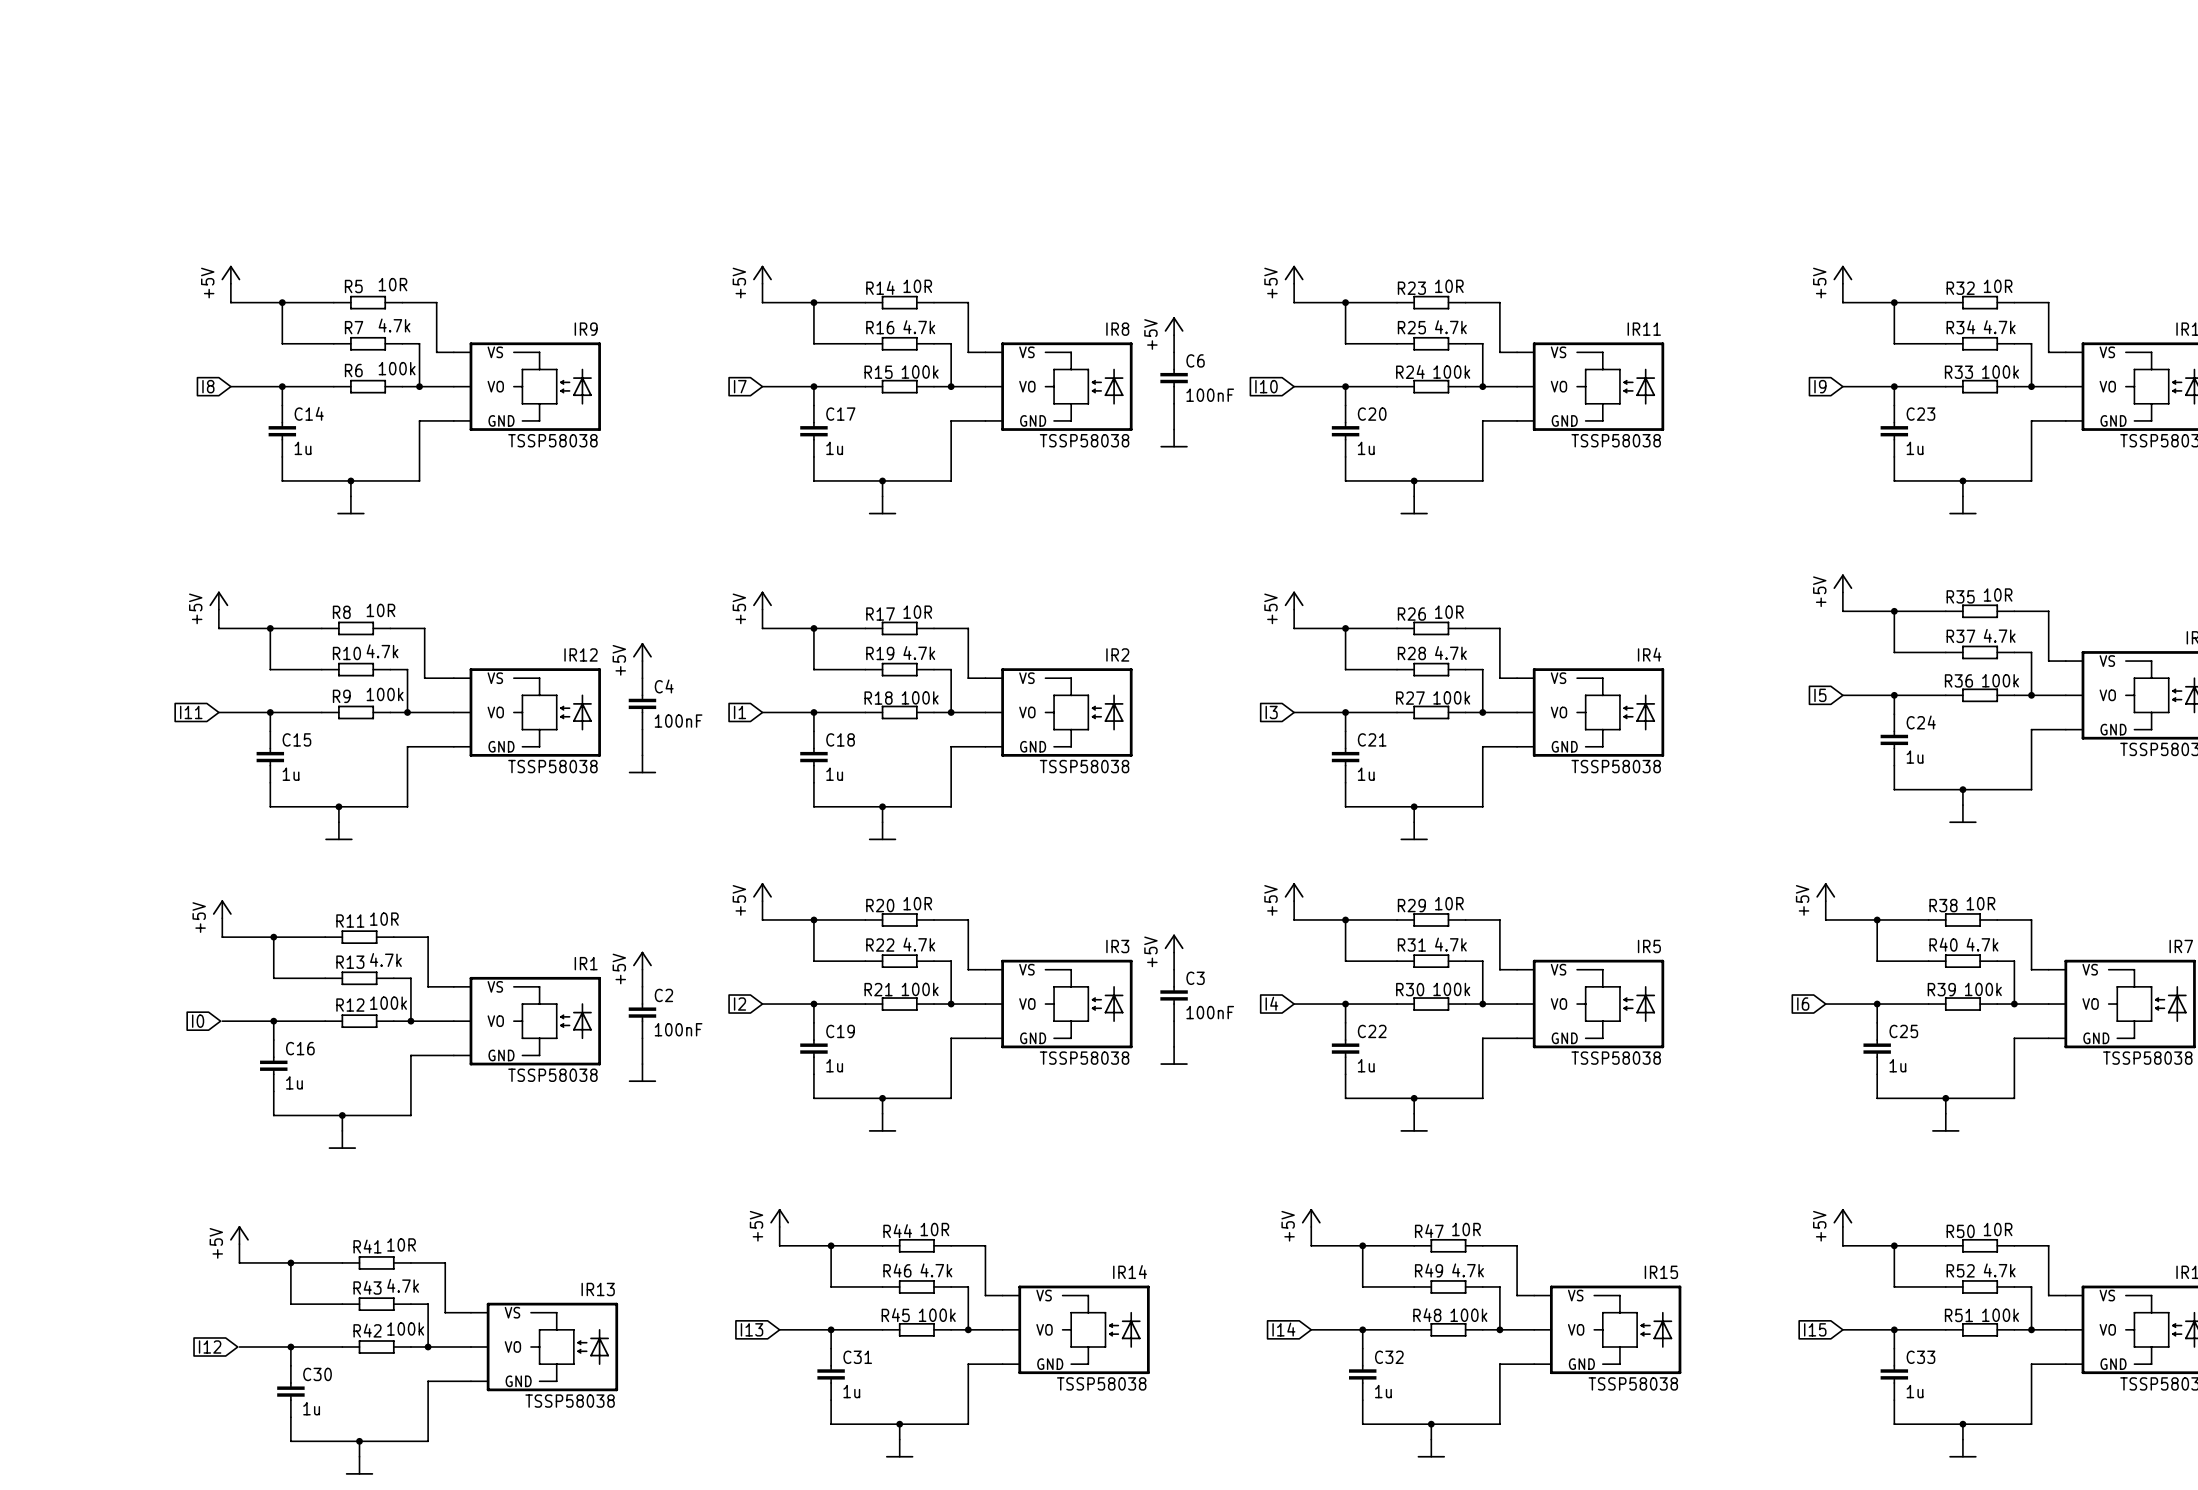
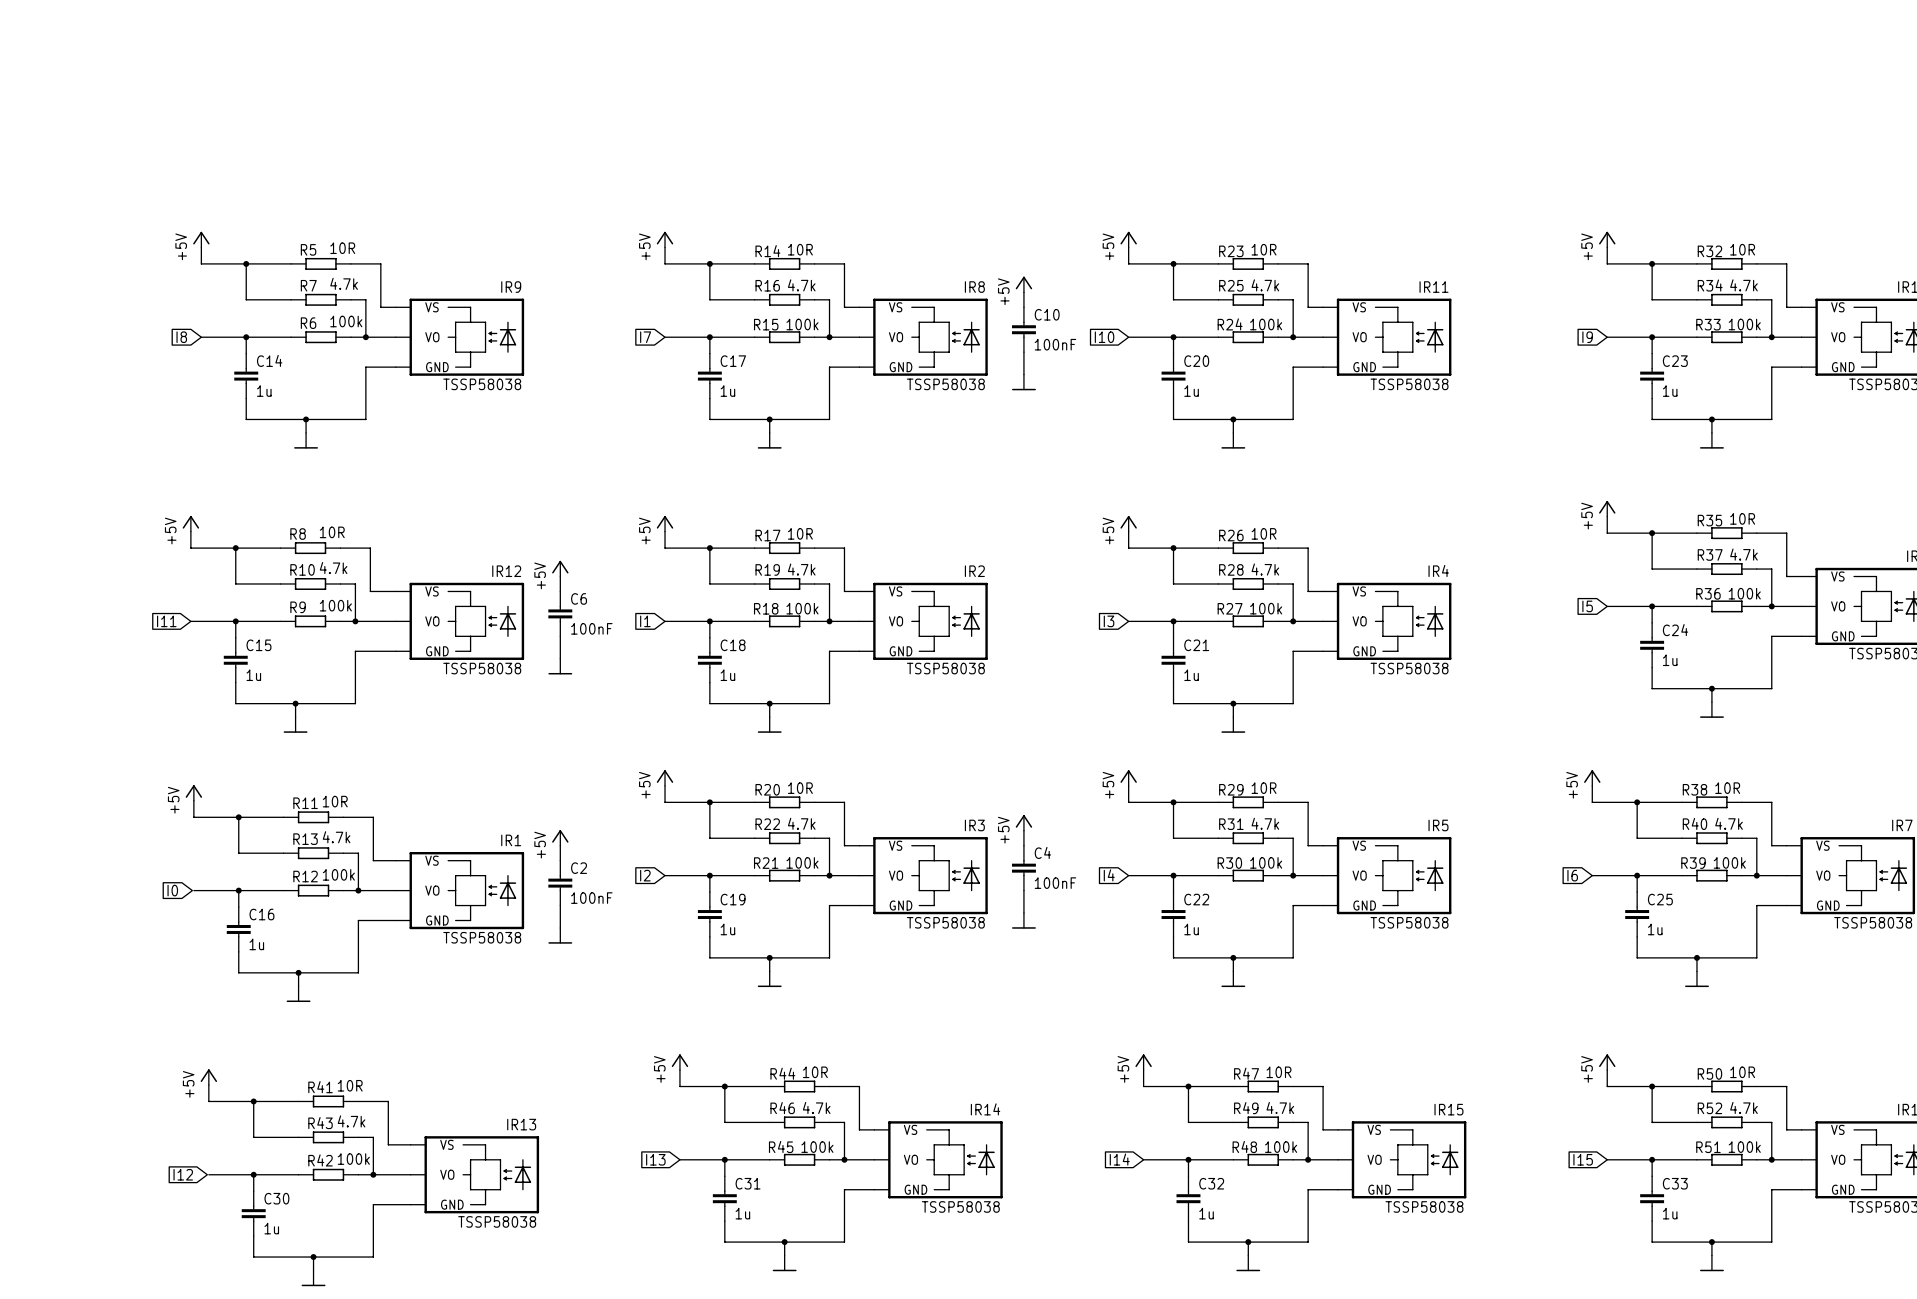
C6 name: C6 (1195, 360) -> C10 (1047, 314)
C4 name: C4 (664, 686) -> C6 (579, 598)
C3 name: C3 (1195, 978) -> C4 (1042, 852)

